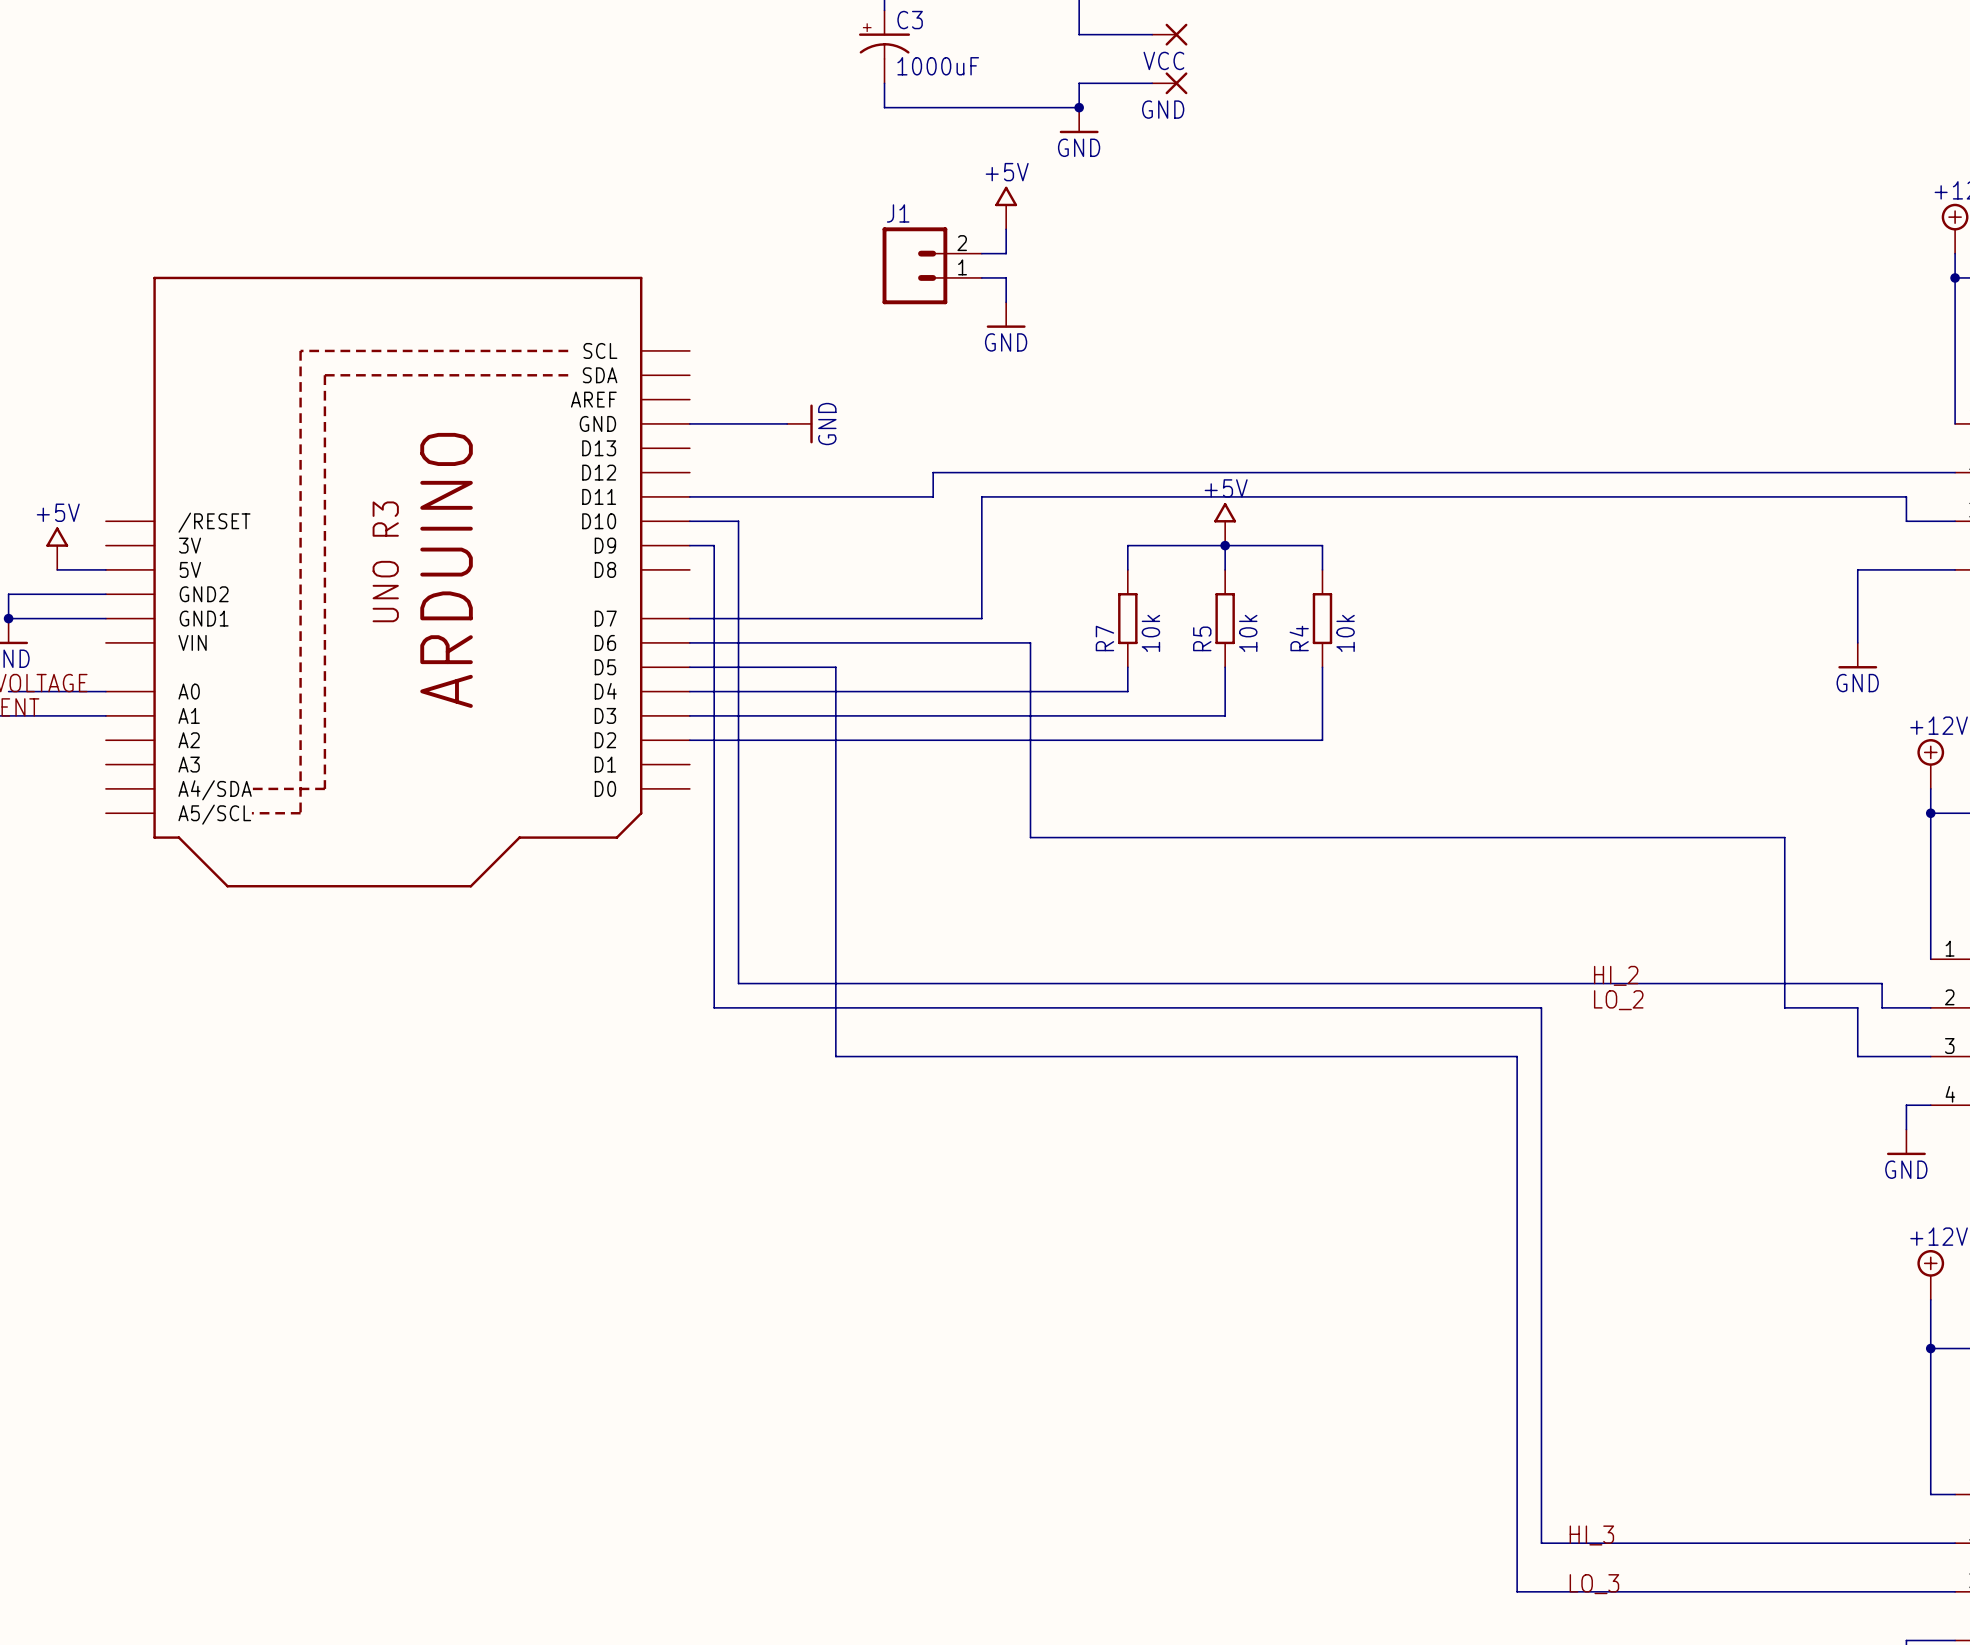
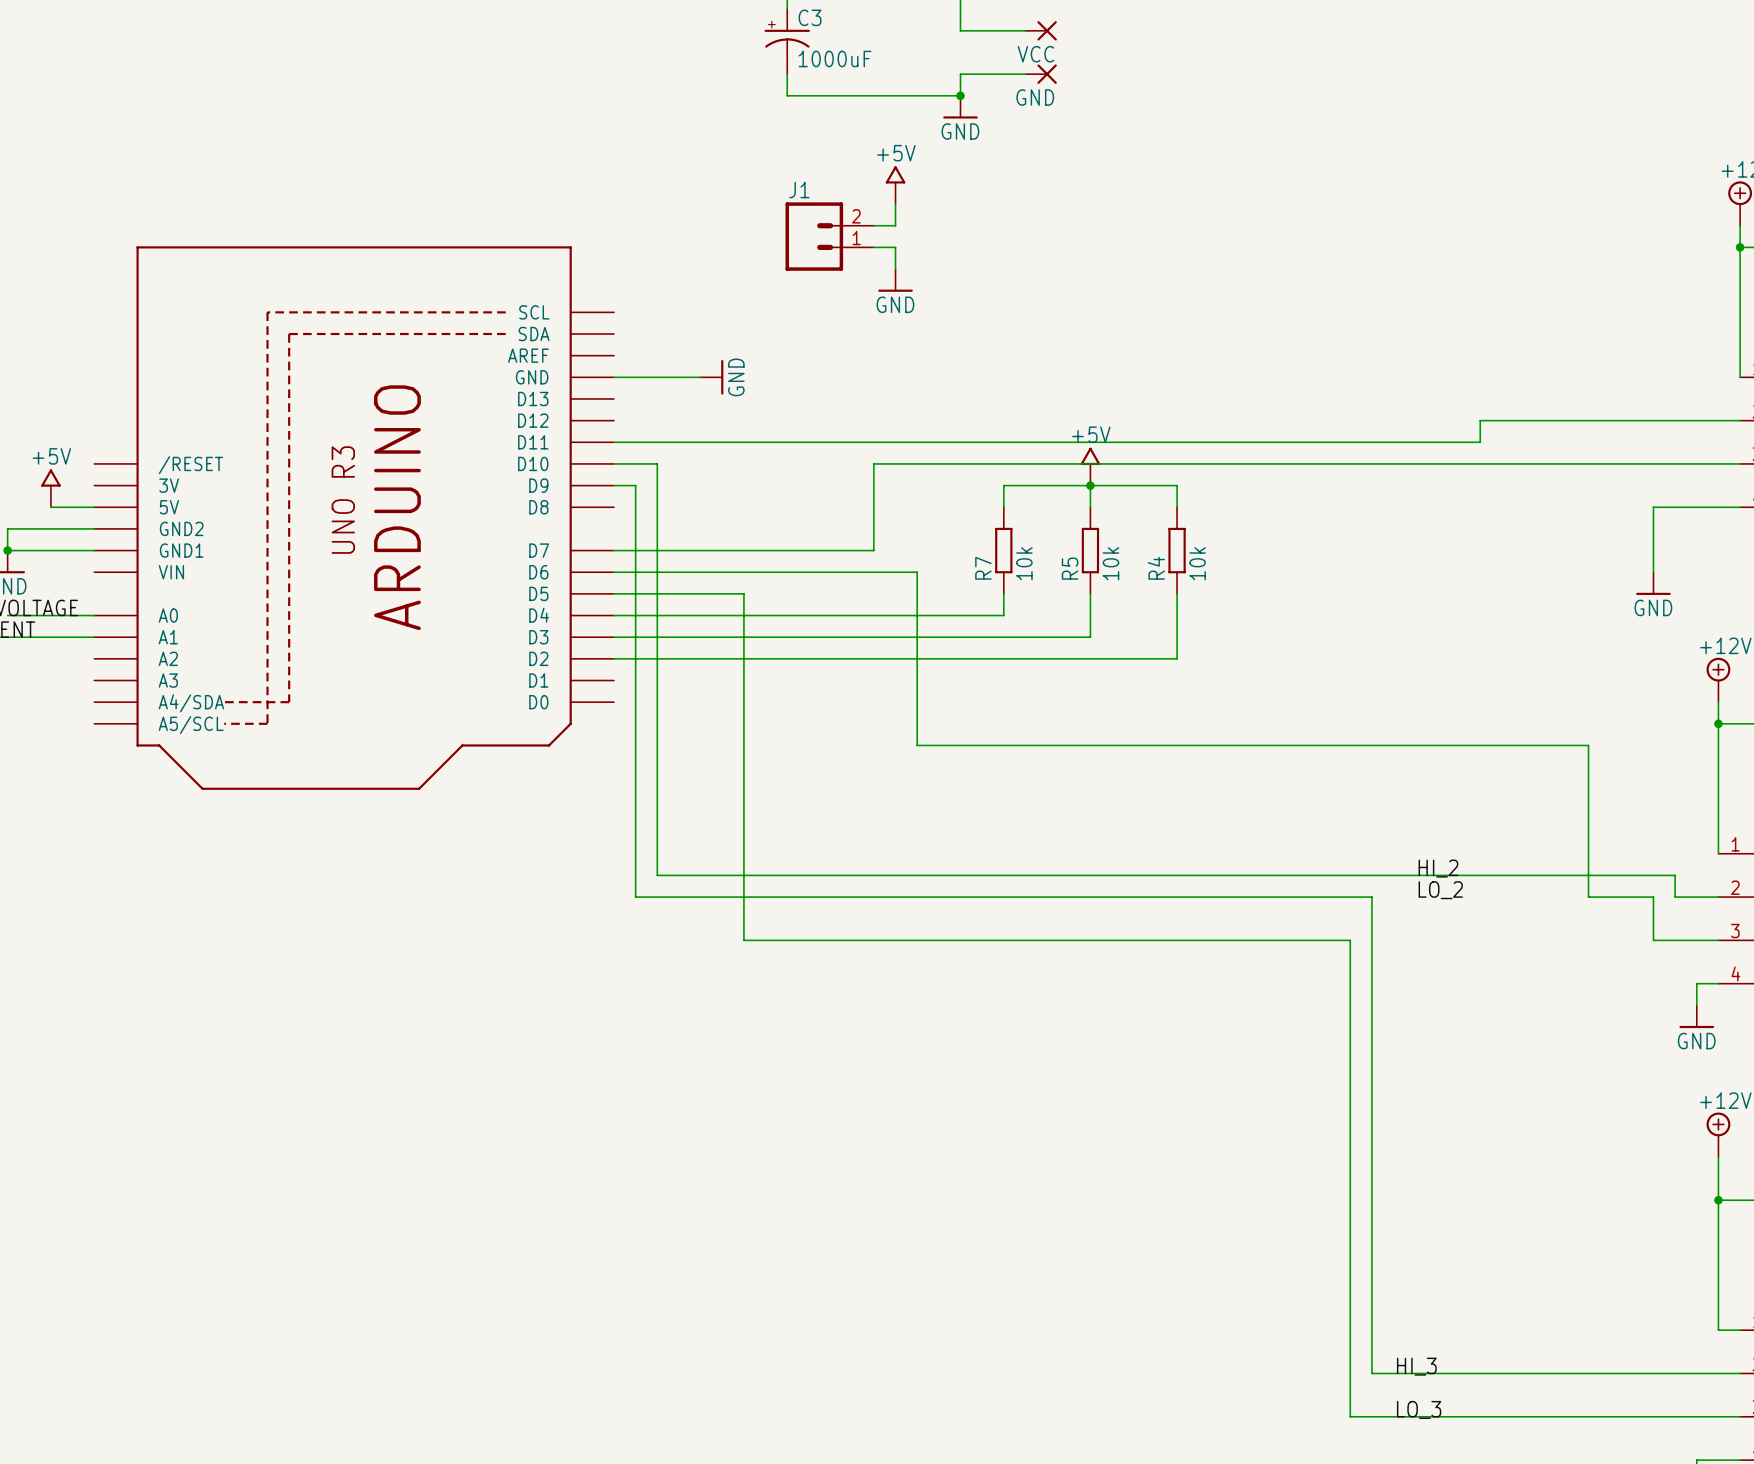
wire: (1663, 472) (933, 472) (933, 496) -> none
wire: (981, 496) (981, 521) -> (873, 442) (830, 442)
wire: (1663, 496) (1906, 496) (1906, 521) -> (1480, 442) (1480, 420)
wire: none -> (873, 463) (1696, 463)

